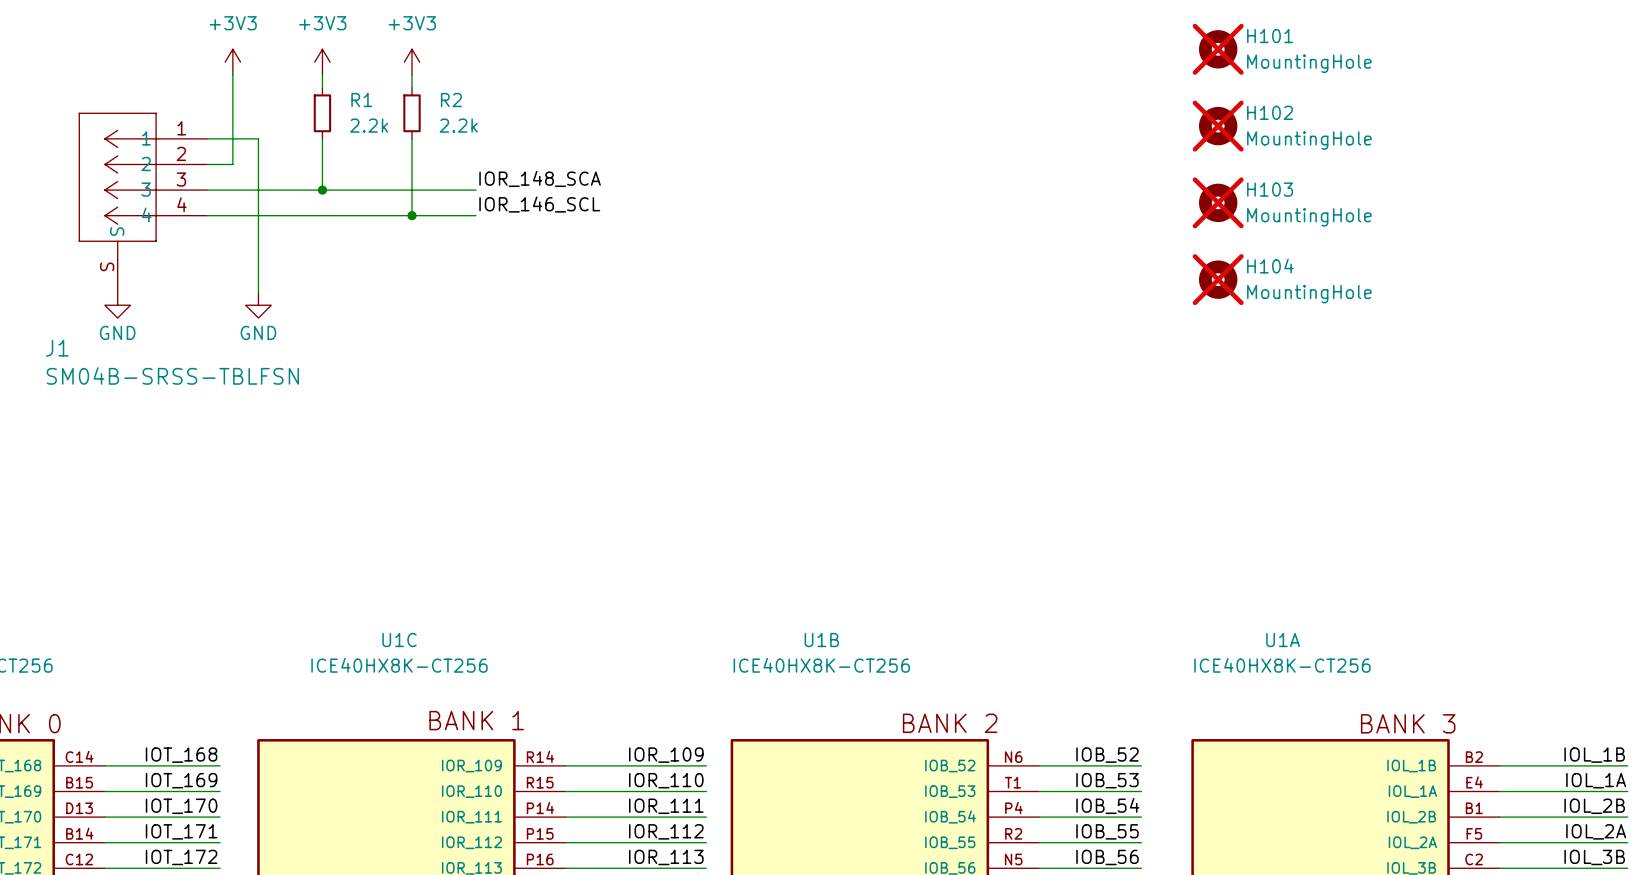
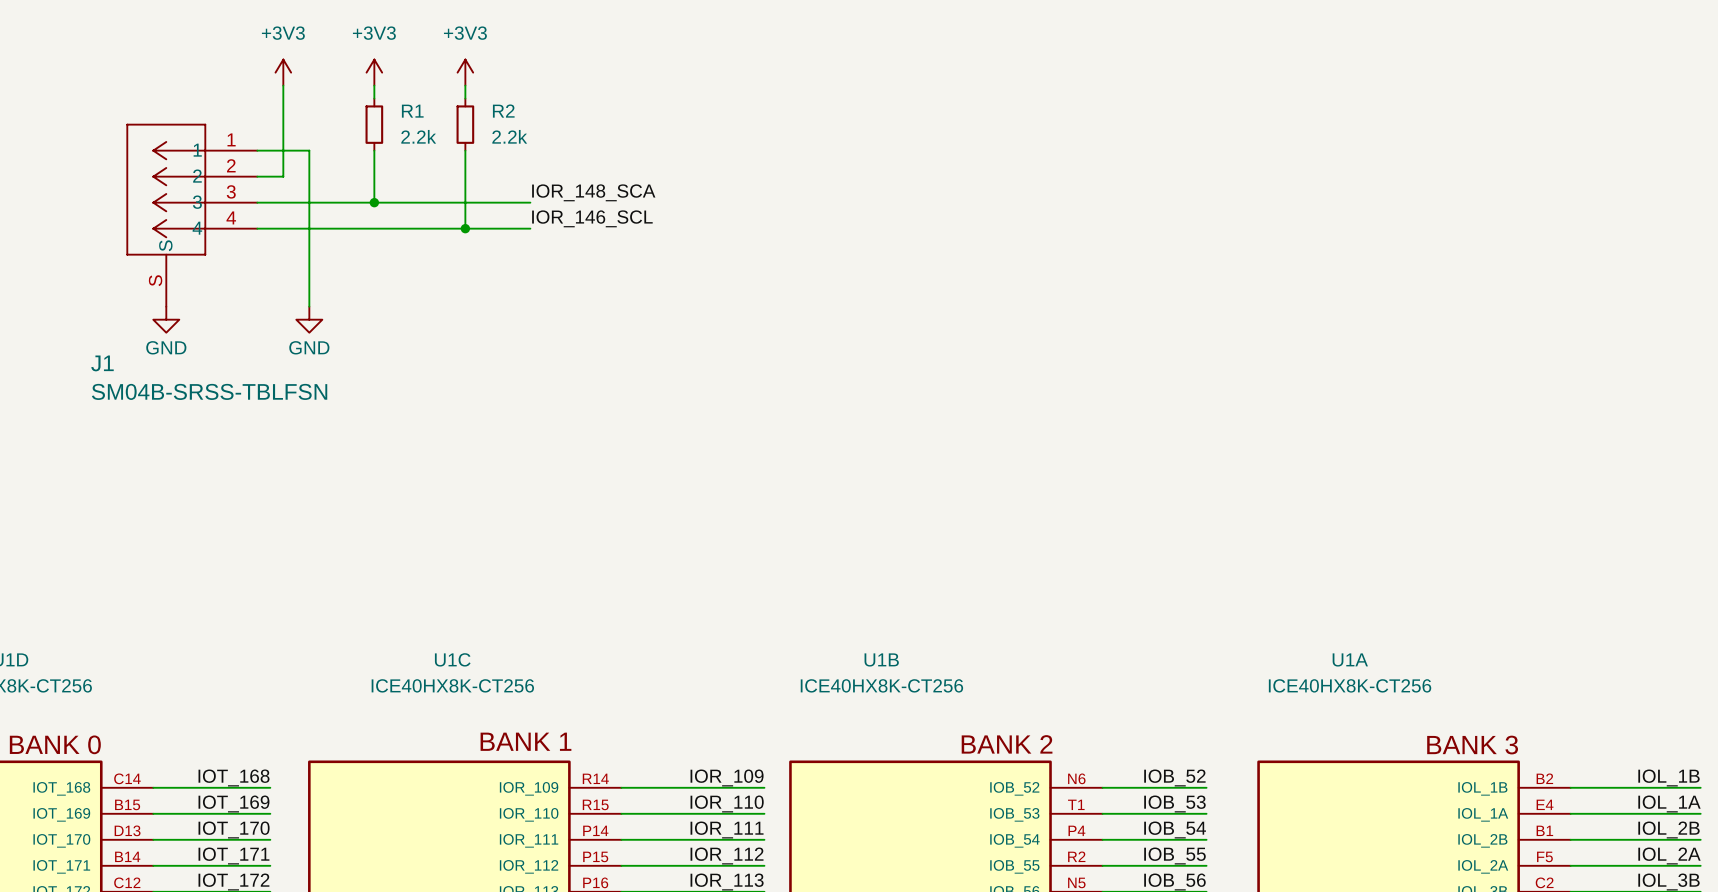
H101: MountingHole (1218, 49) -> none
H102: MountingHole (1218, 126) -> none
H103: MountingHole (1218, 202) -> none
H104: MountingHole (1218, 279) -> none

